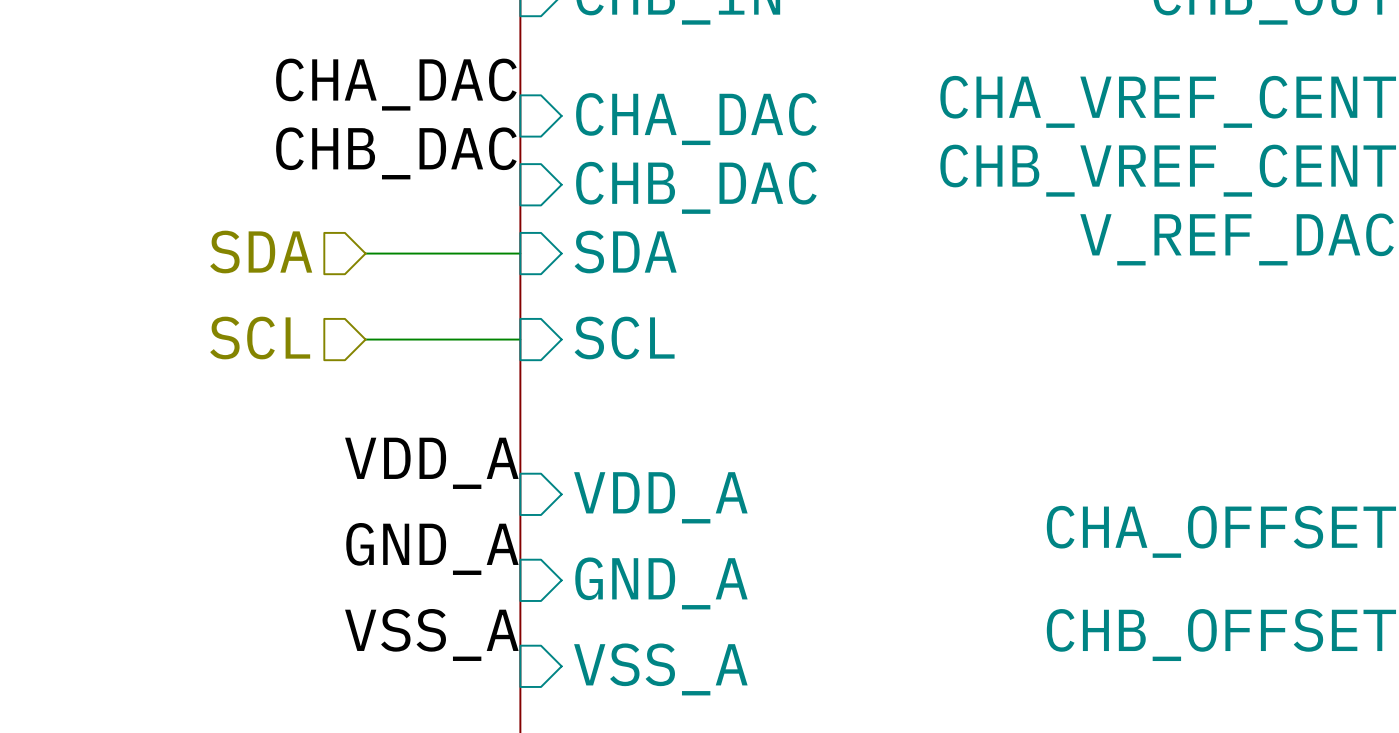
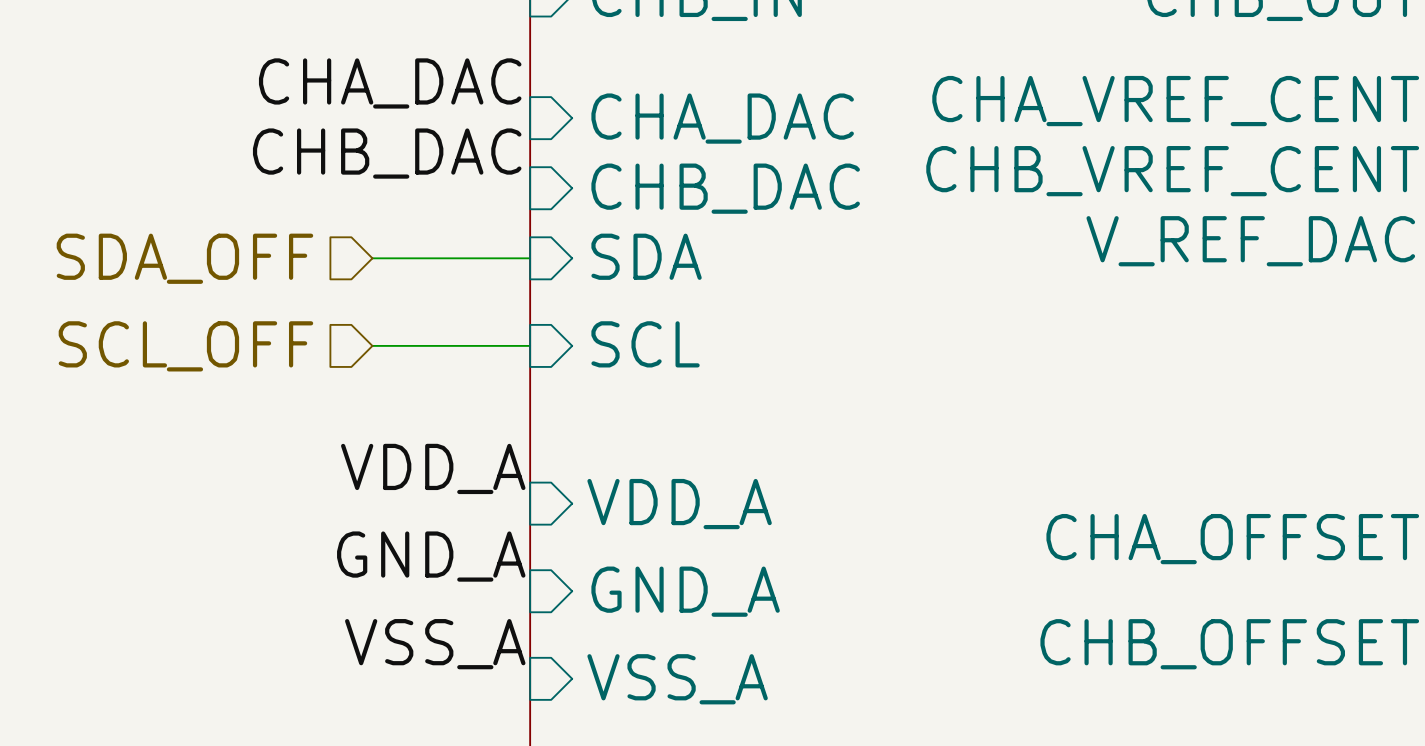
hierarchical label: SDA (261, 252) -> SDA_OFF (184, 258)
hierarchical label: SCL (260, 338) -> SCL_OFF (185, 346)

